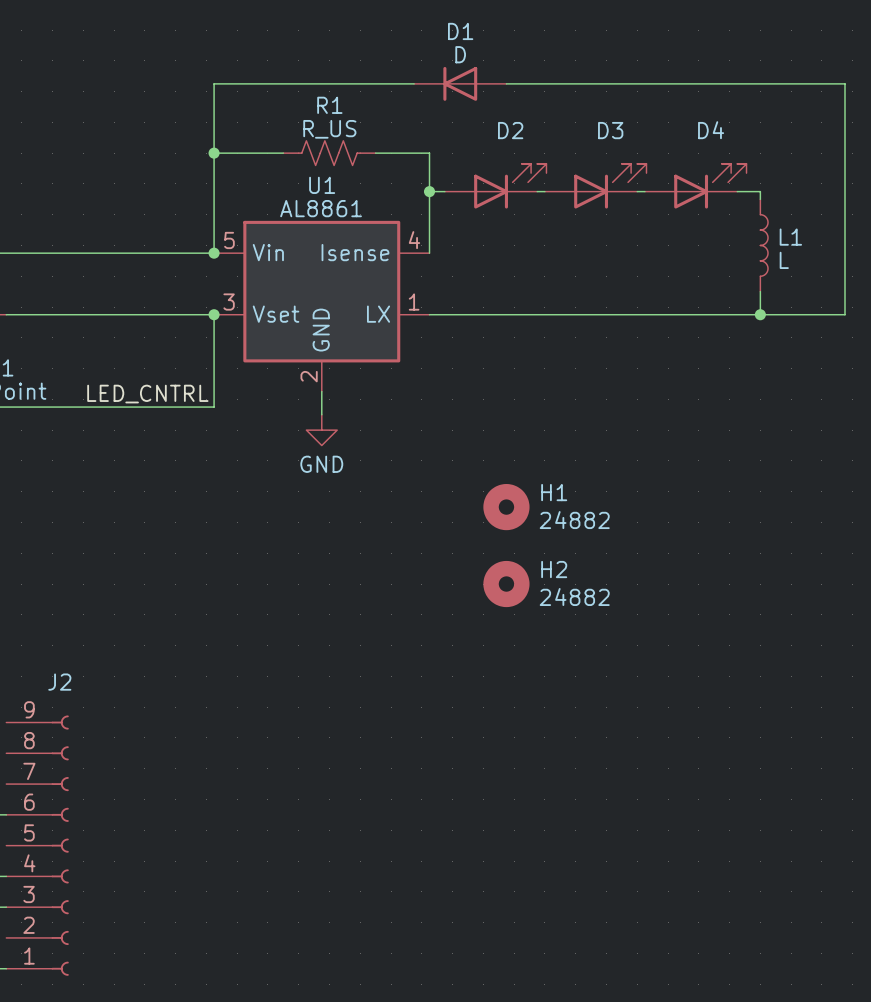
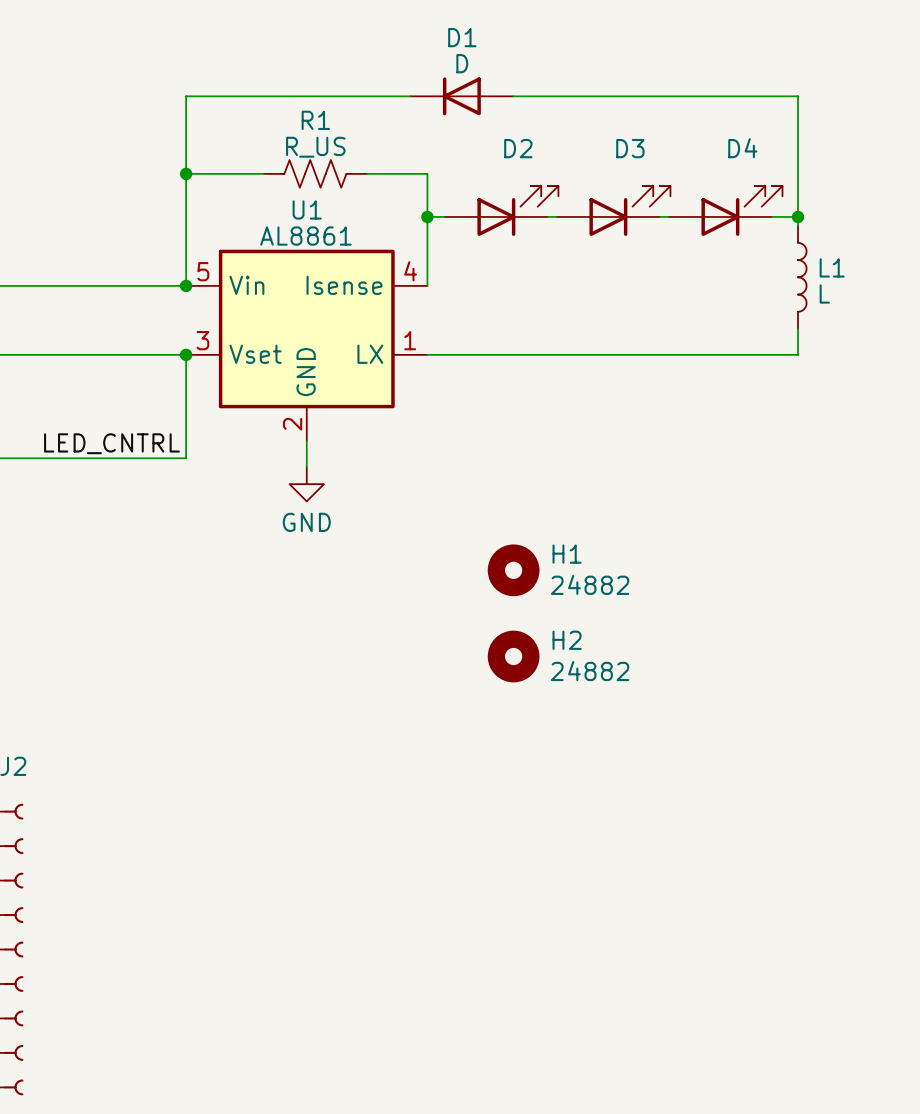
wire: (760, 83) (845, 83) (845, 314) (760, 314) -> (798, 96) (798, 216)
junction: none -> (798, 216)
junction: (760, 314) -> none

